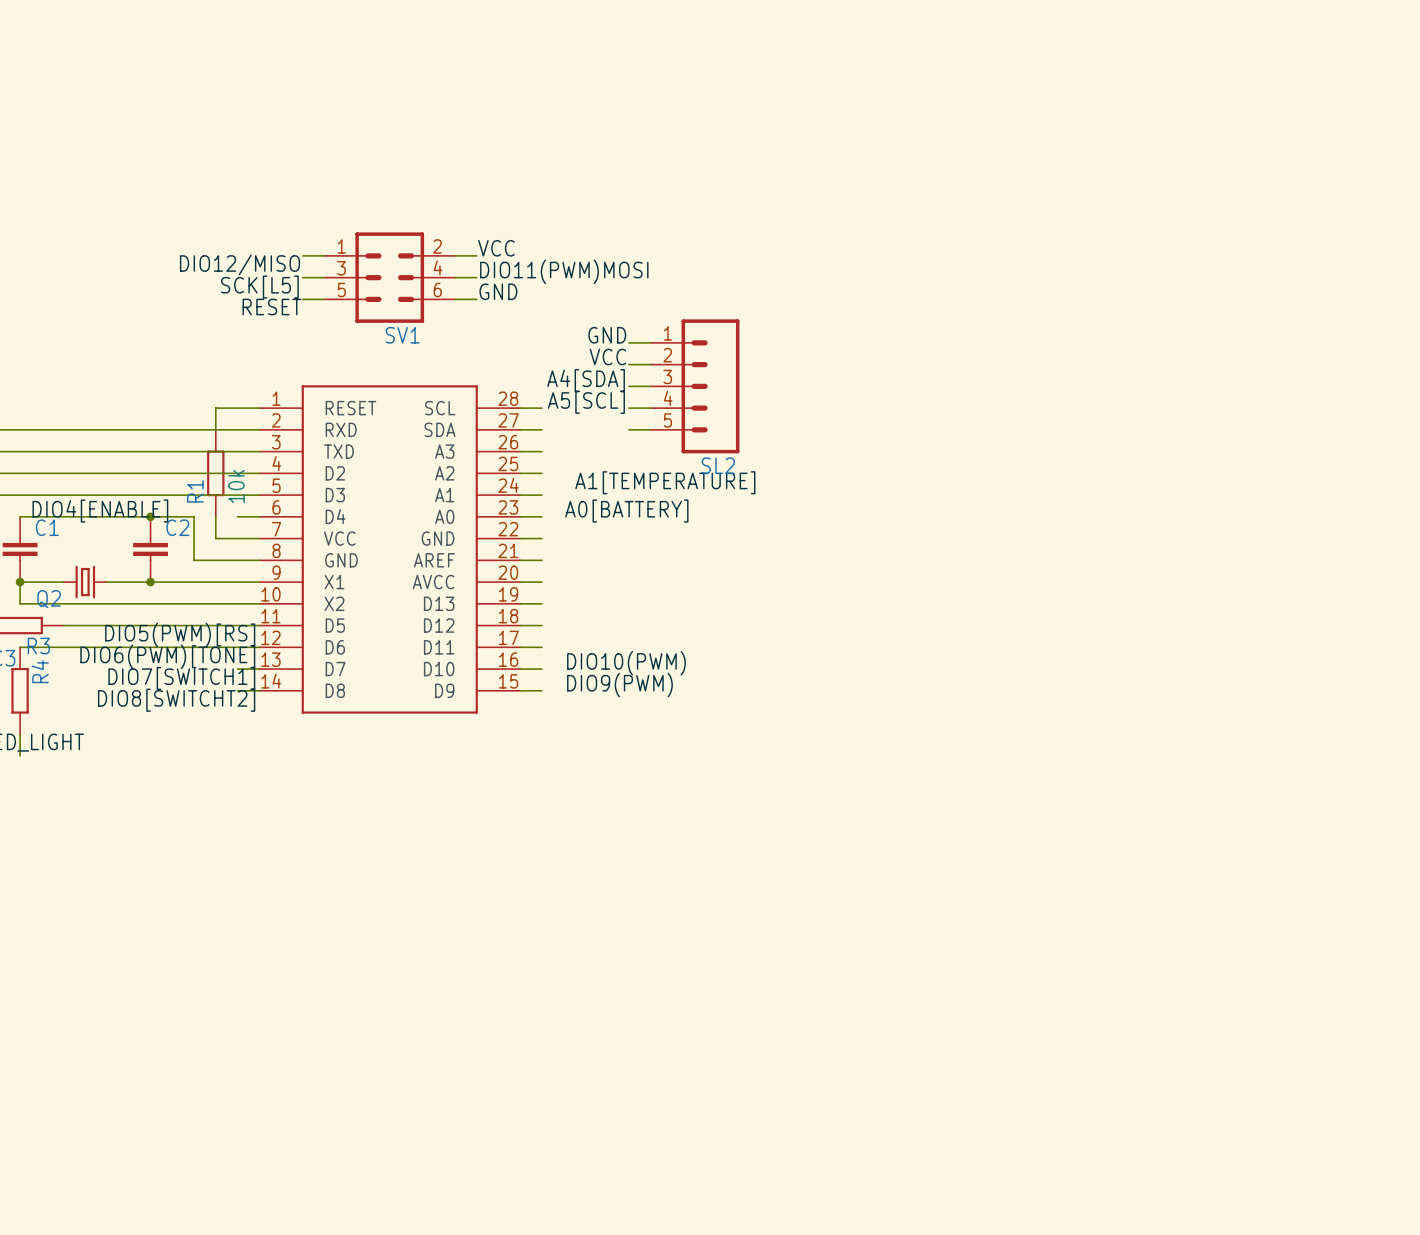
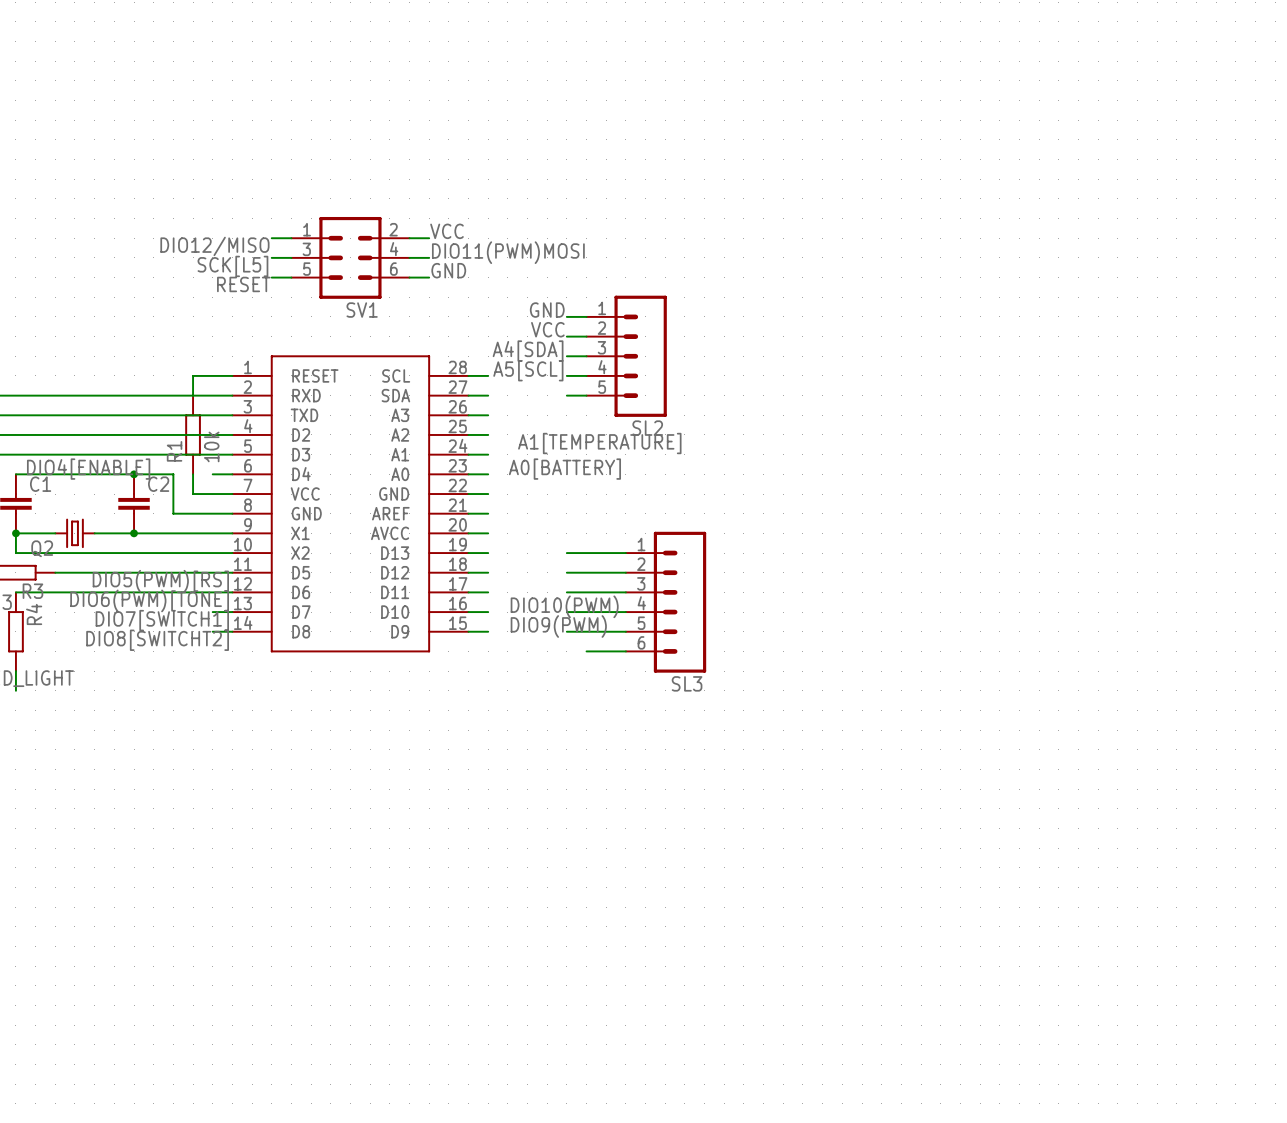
wire: none -> (566, 553) (625, 553)
wire: none -> (566, 572) (625, 572)
wire: none -> (566, 592) (625, 592)
SL3: none -> (666, 602)
wire: none -> (566, 612) (625, 612)
wire: none -> (566, 631) (625, 631)
wire: none -> (586, 651) (625, 651)

